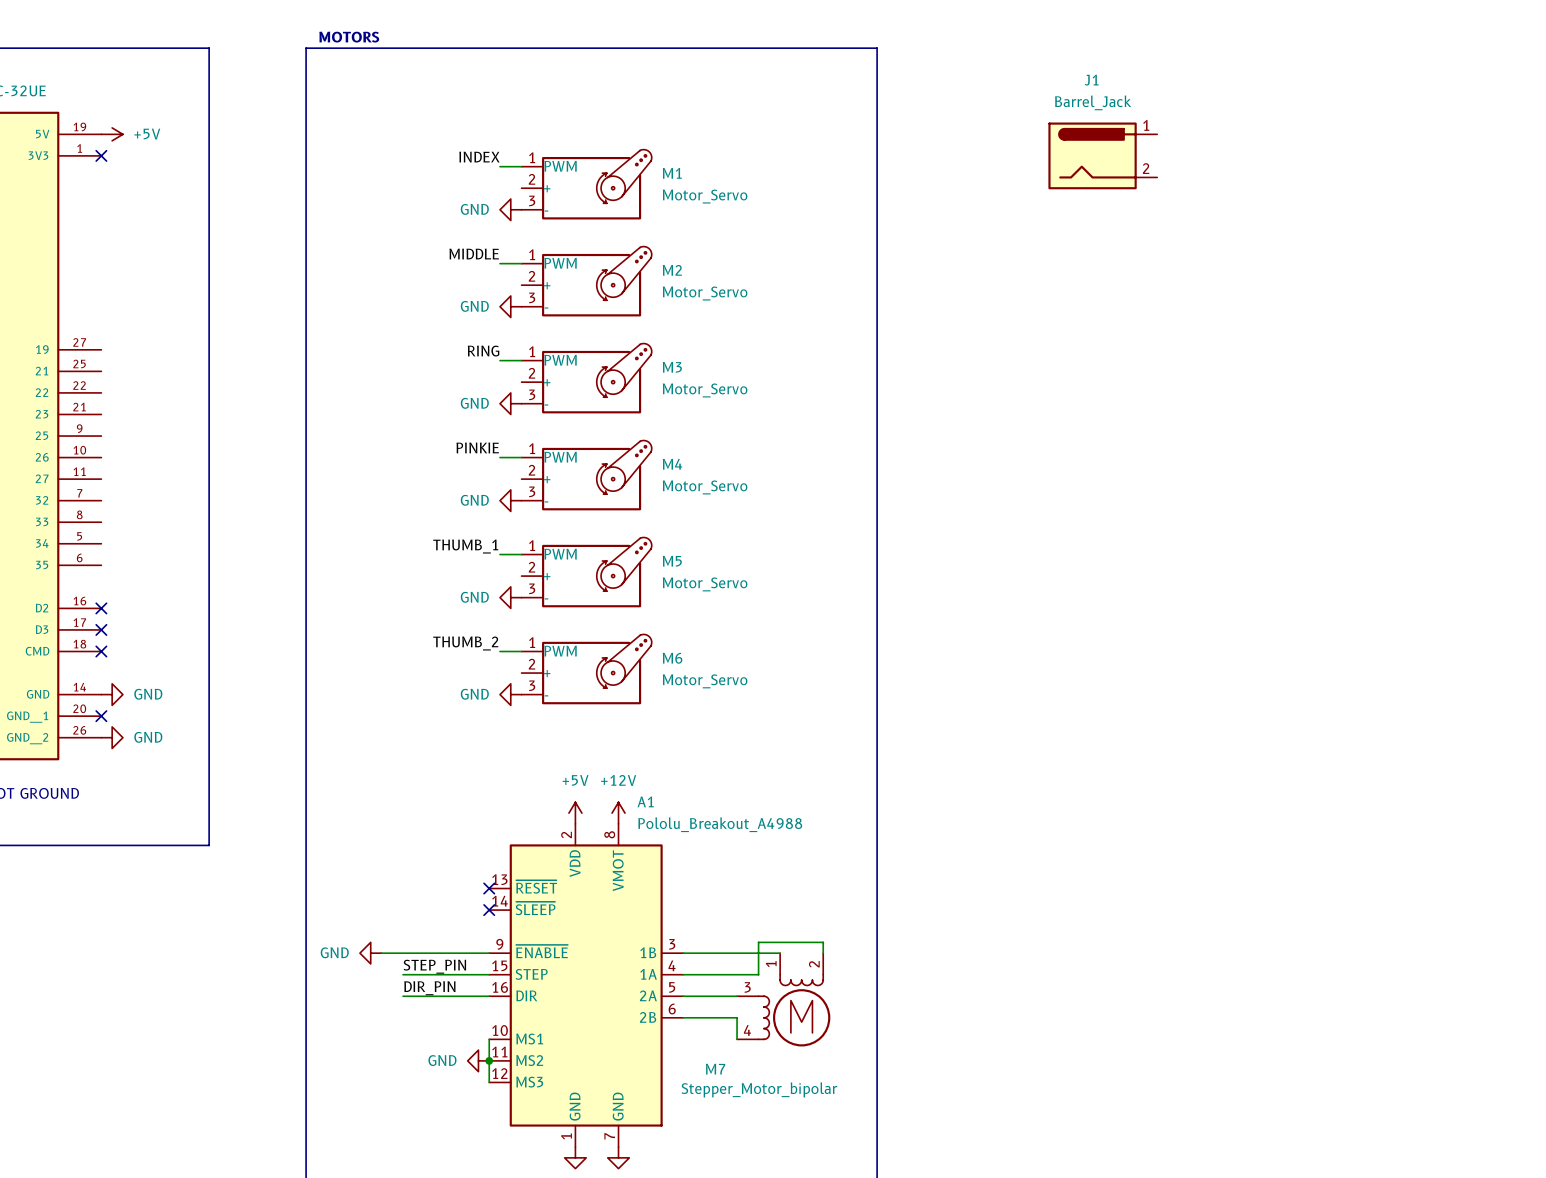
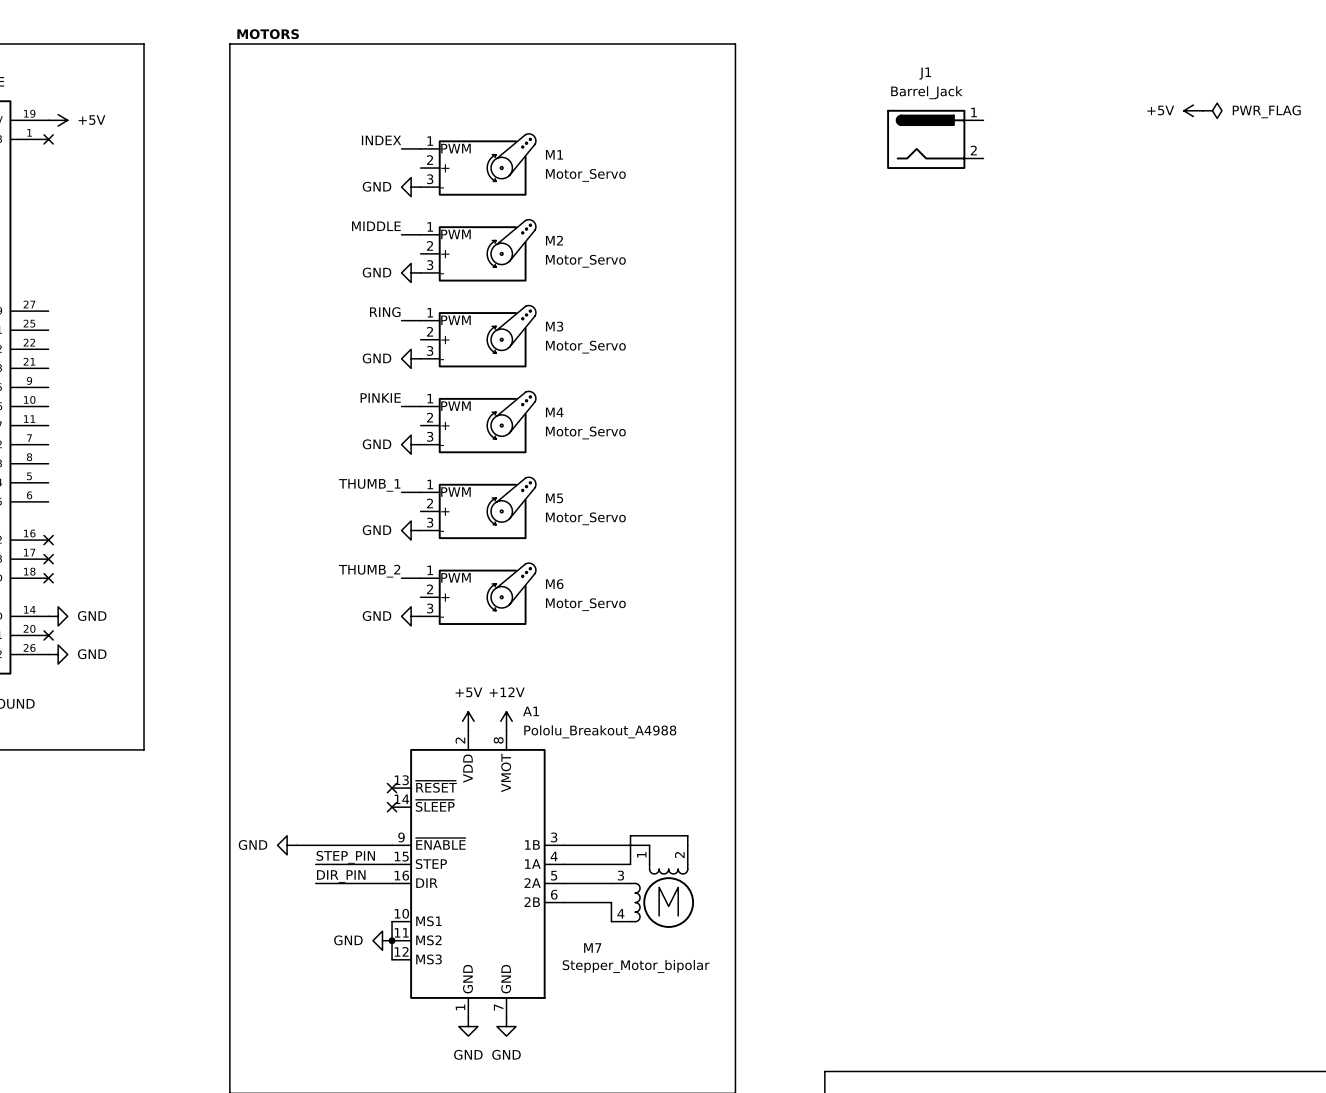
power symbol: none -> +5V (1193, 110)
power symbol: none -> PWR_FLAG (1212, 110)

